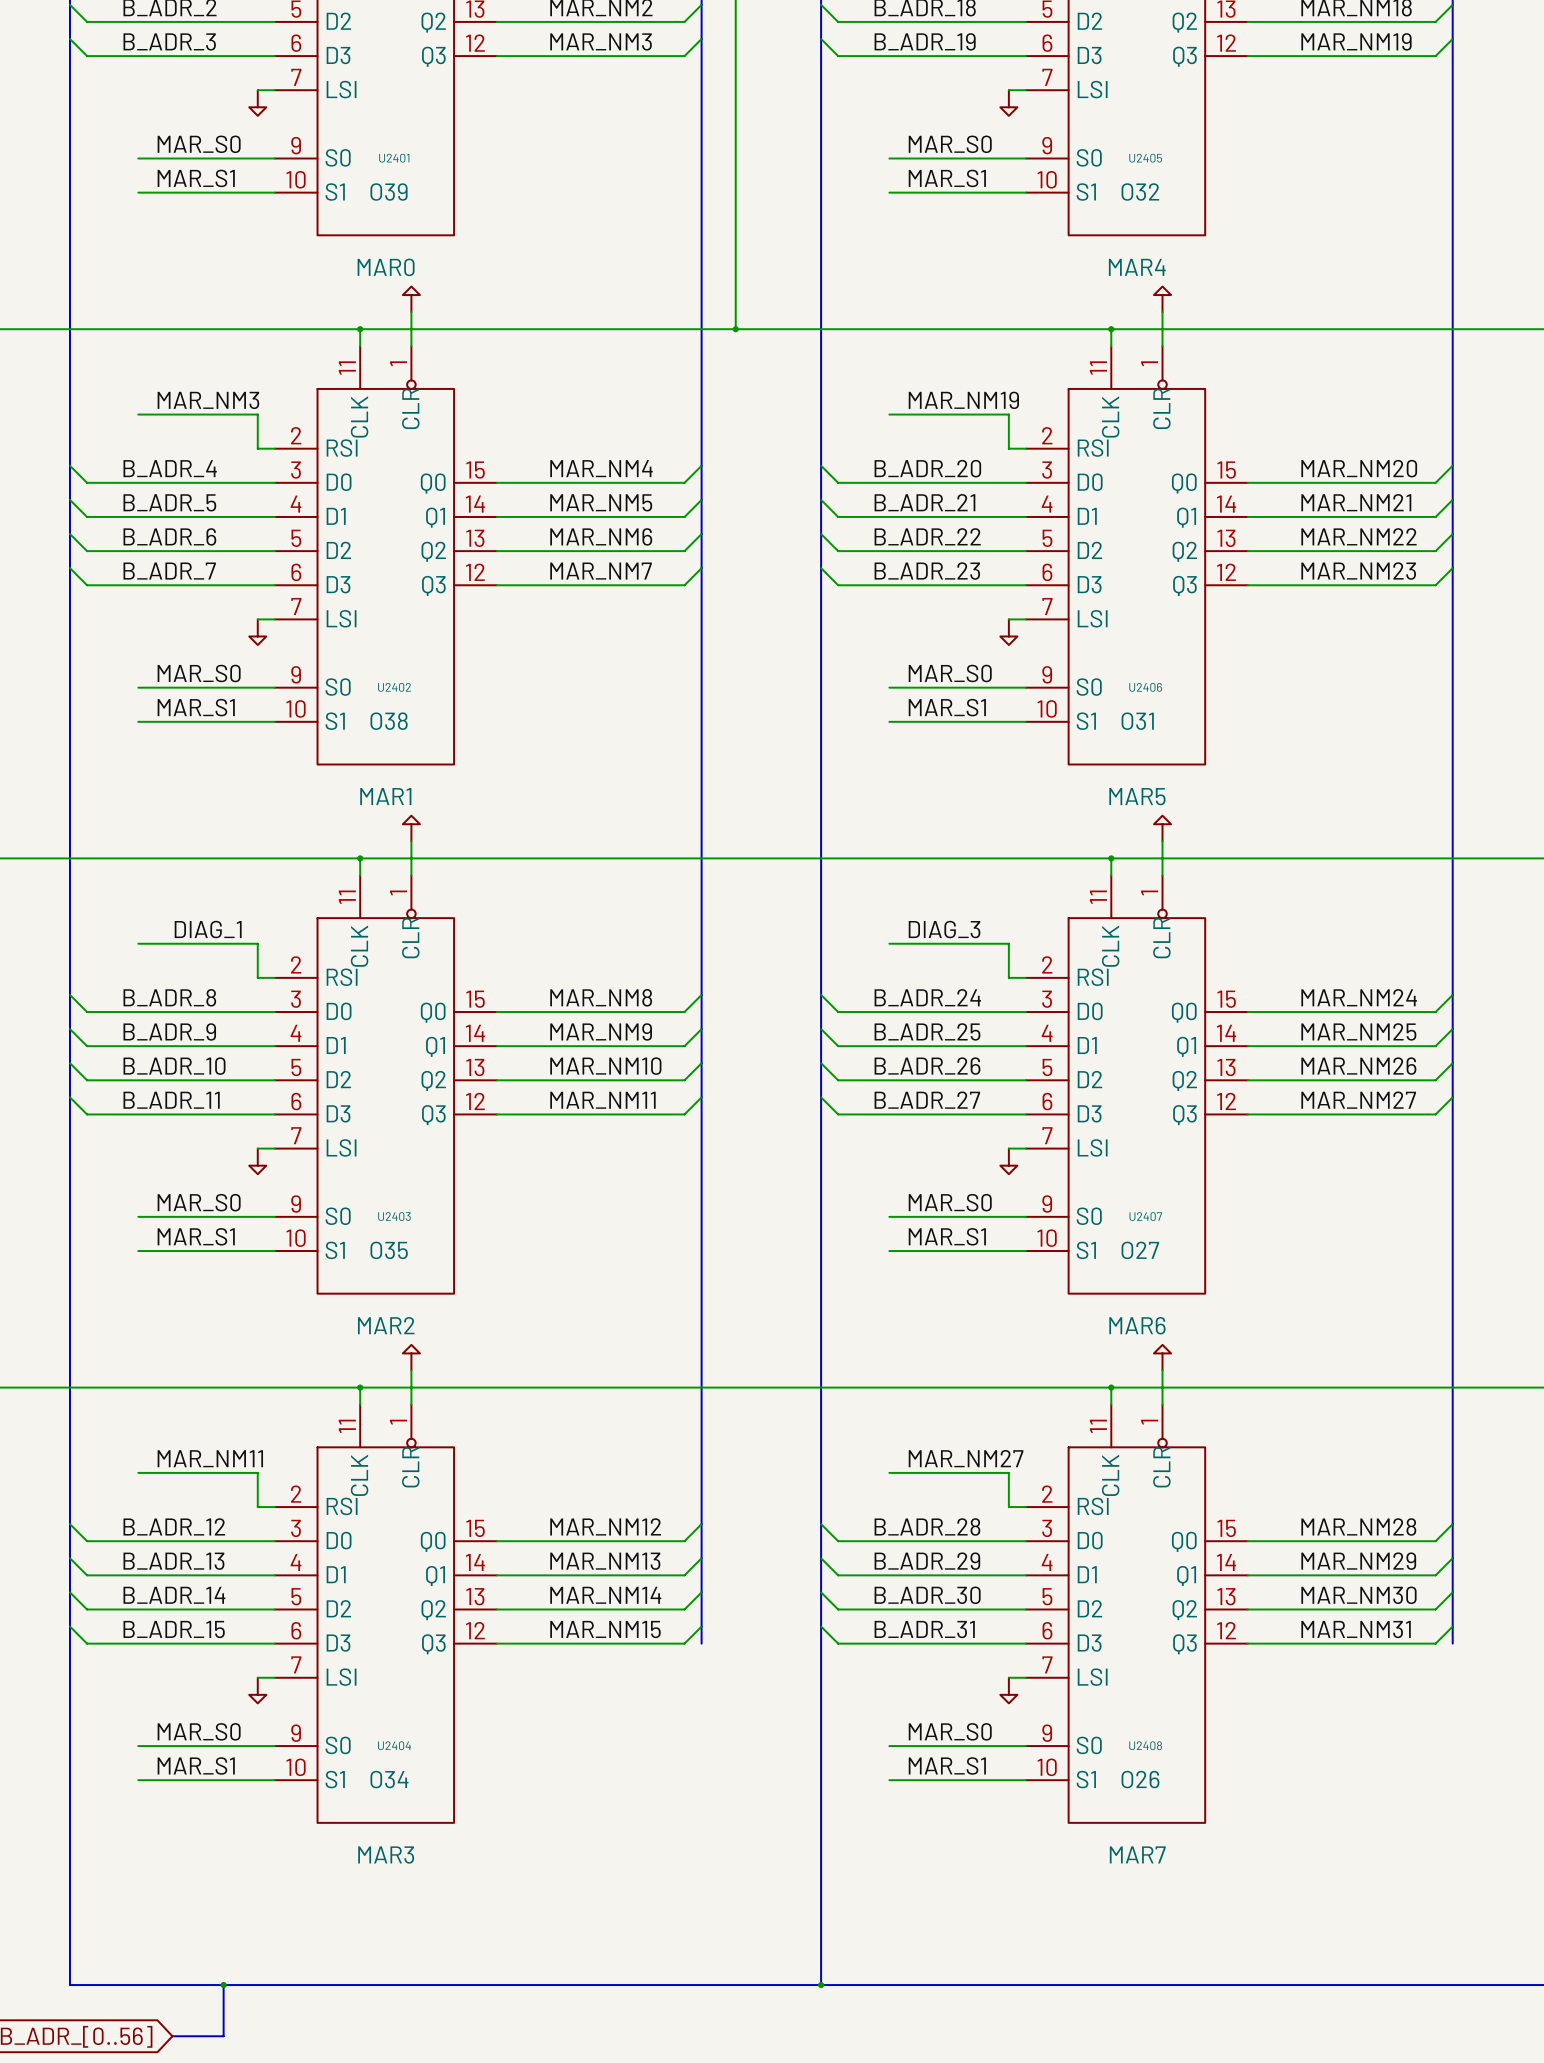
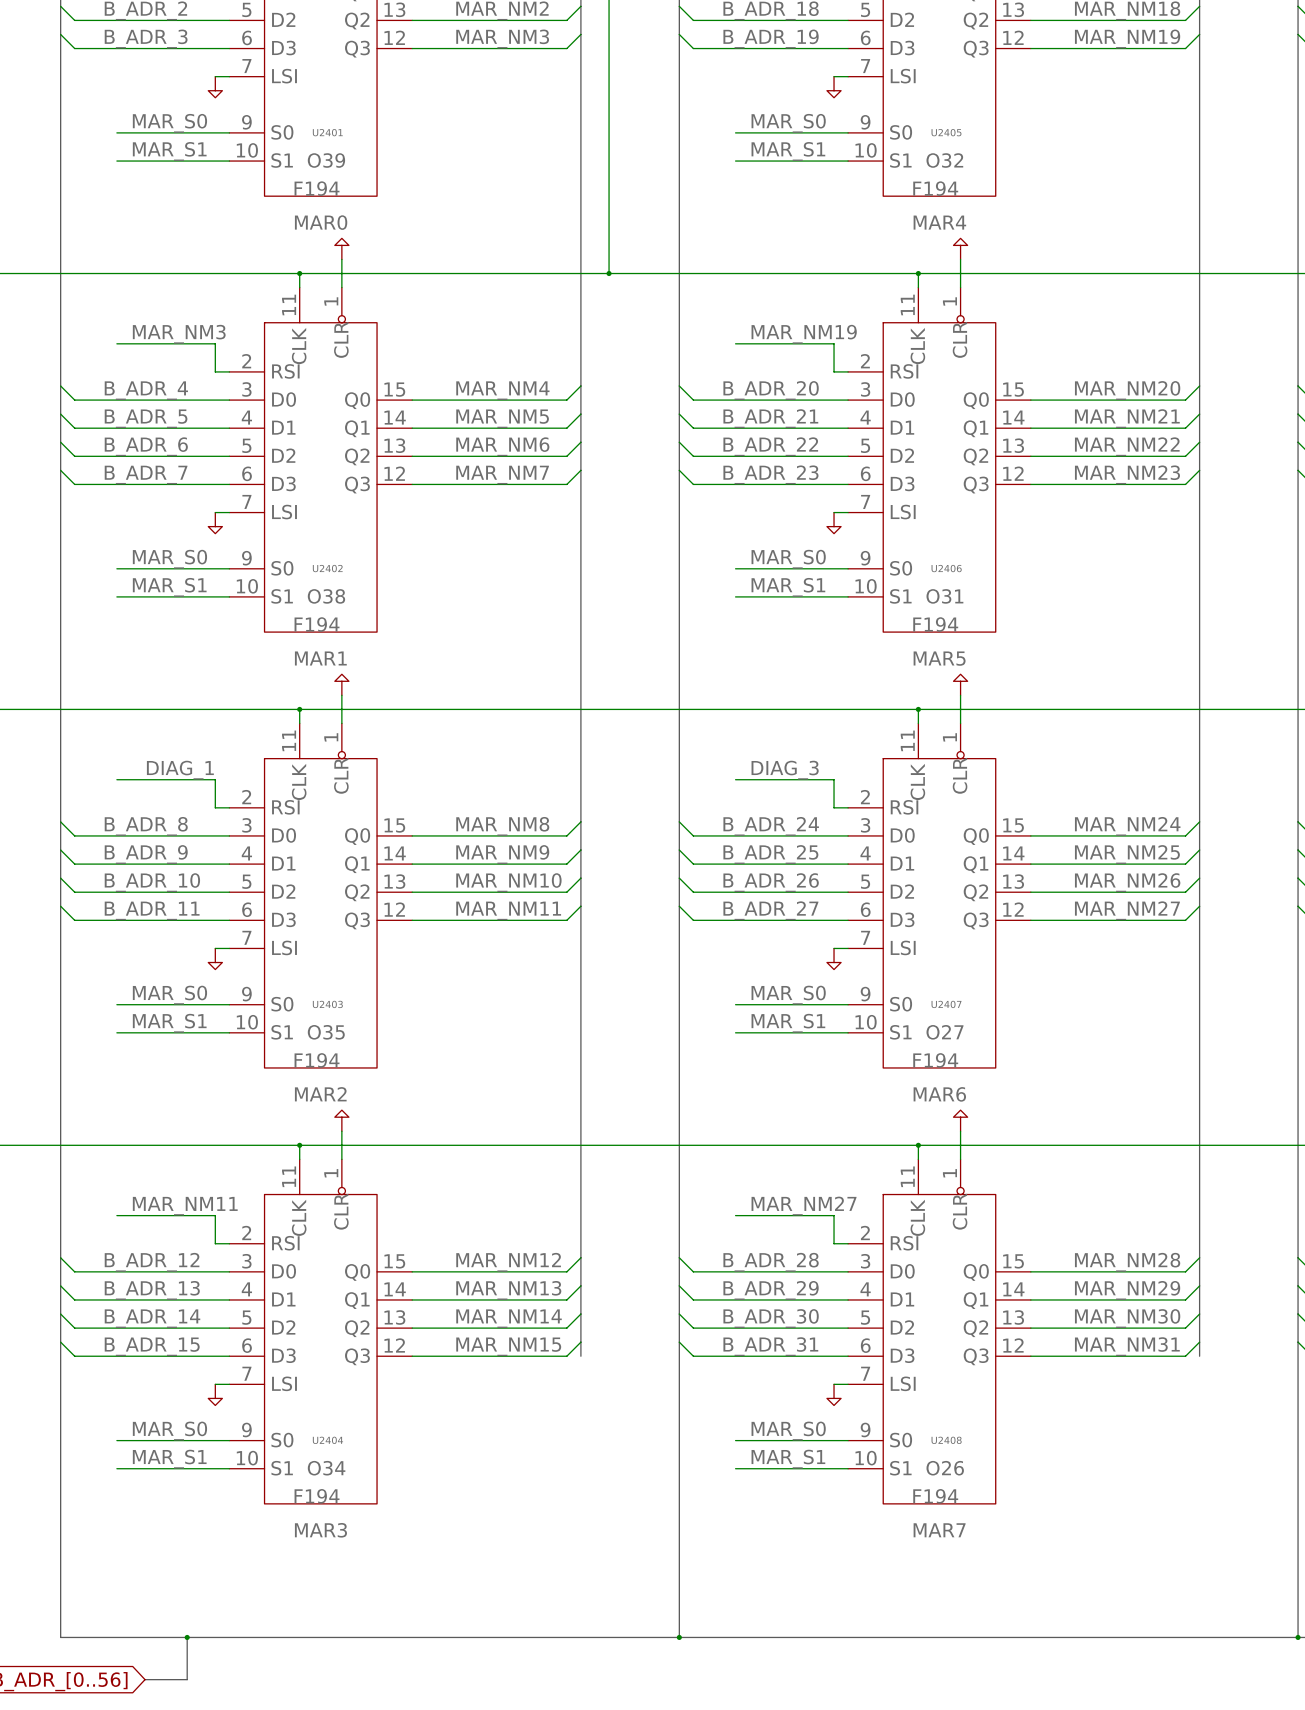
U2401 value: none -> F194 (317, 188)
U2405 value: none -> F194 (935, 188)
U2402 value: none -> F194 (317, 624)
U2406 value: none -> F194 (935, 624)
U2403 value: none -> F194 (317, 1060)
U2407 value: none -> F194 (935, 1060)
U2404 value: none -> F194 (317, 1496)
U2408 value: none -> F194 (935, 1496)

